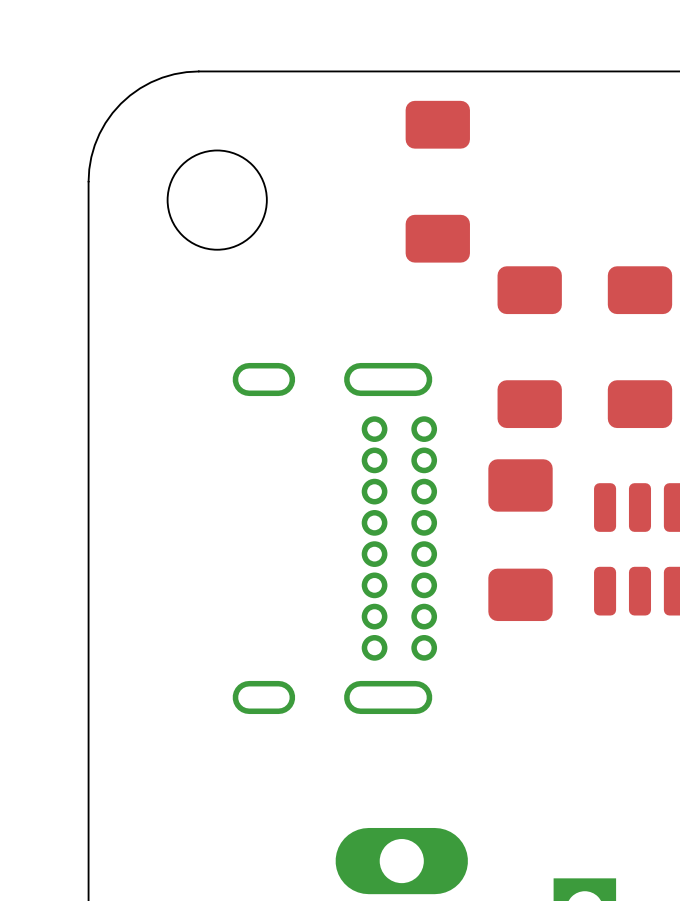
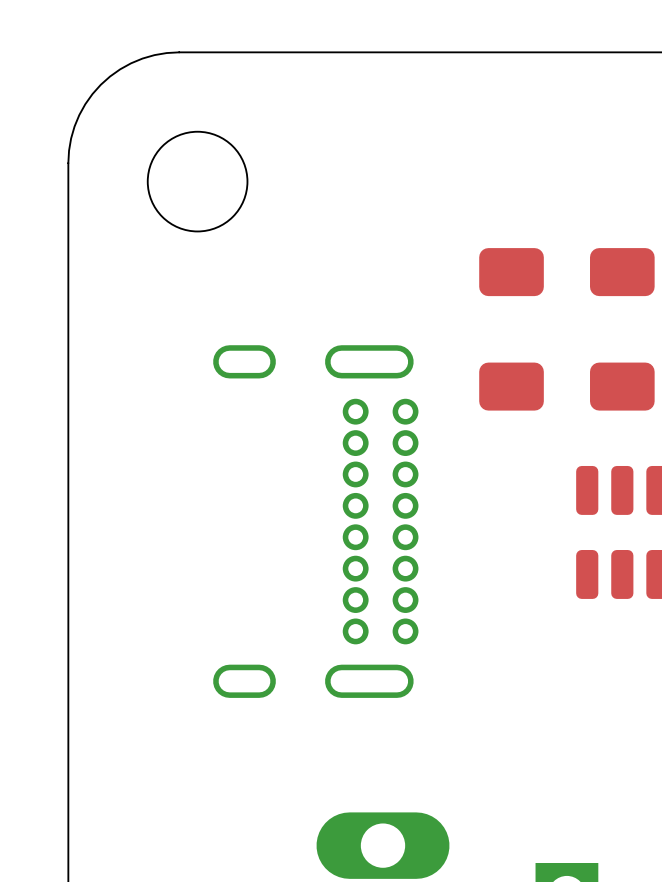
part: (437, 181) -> none
part: (520, 540) -> none

